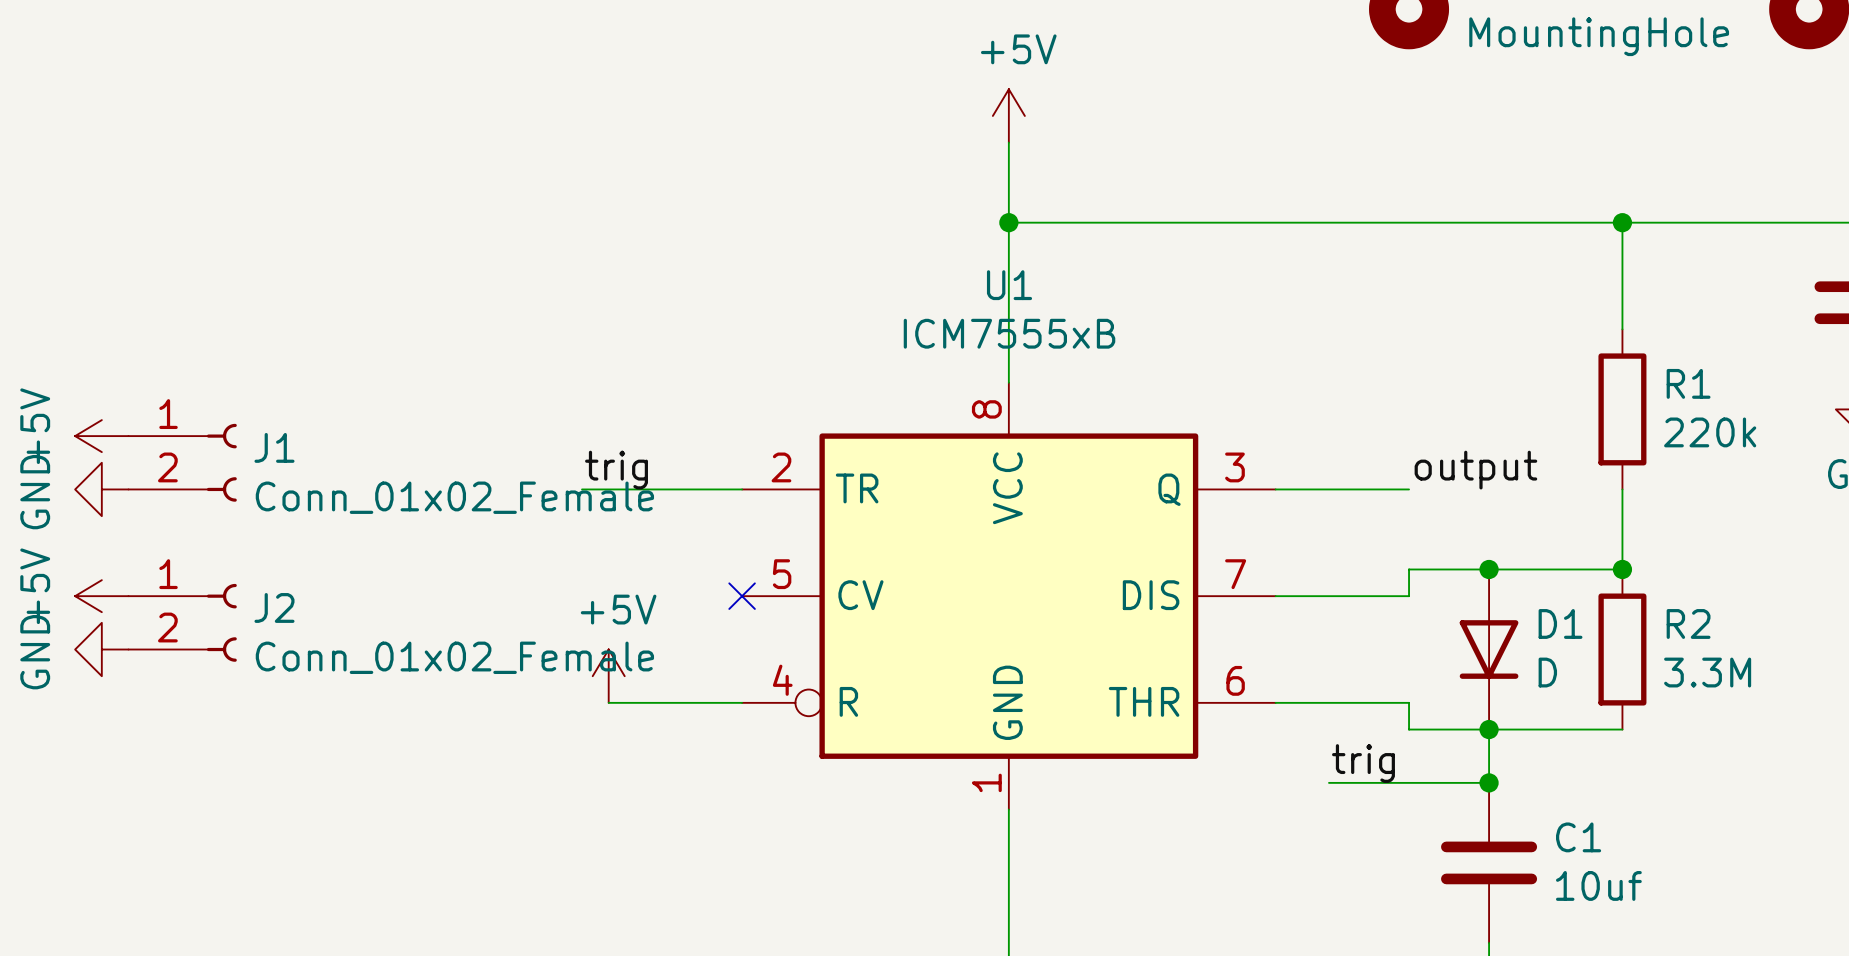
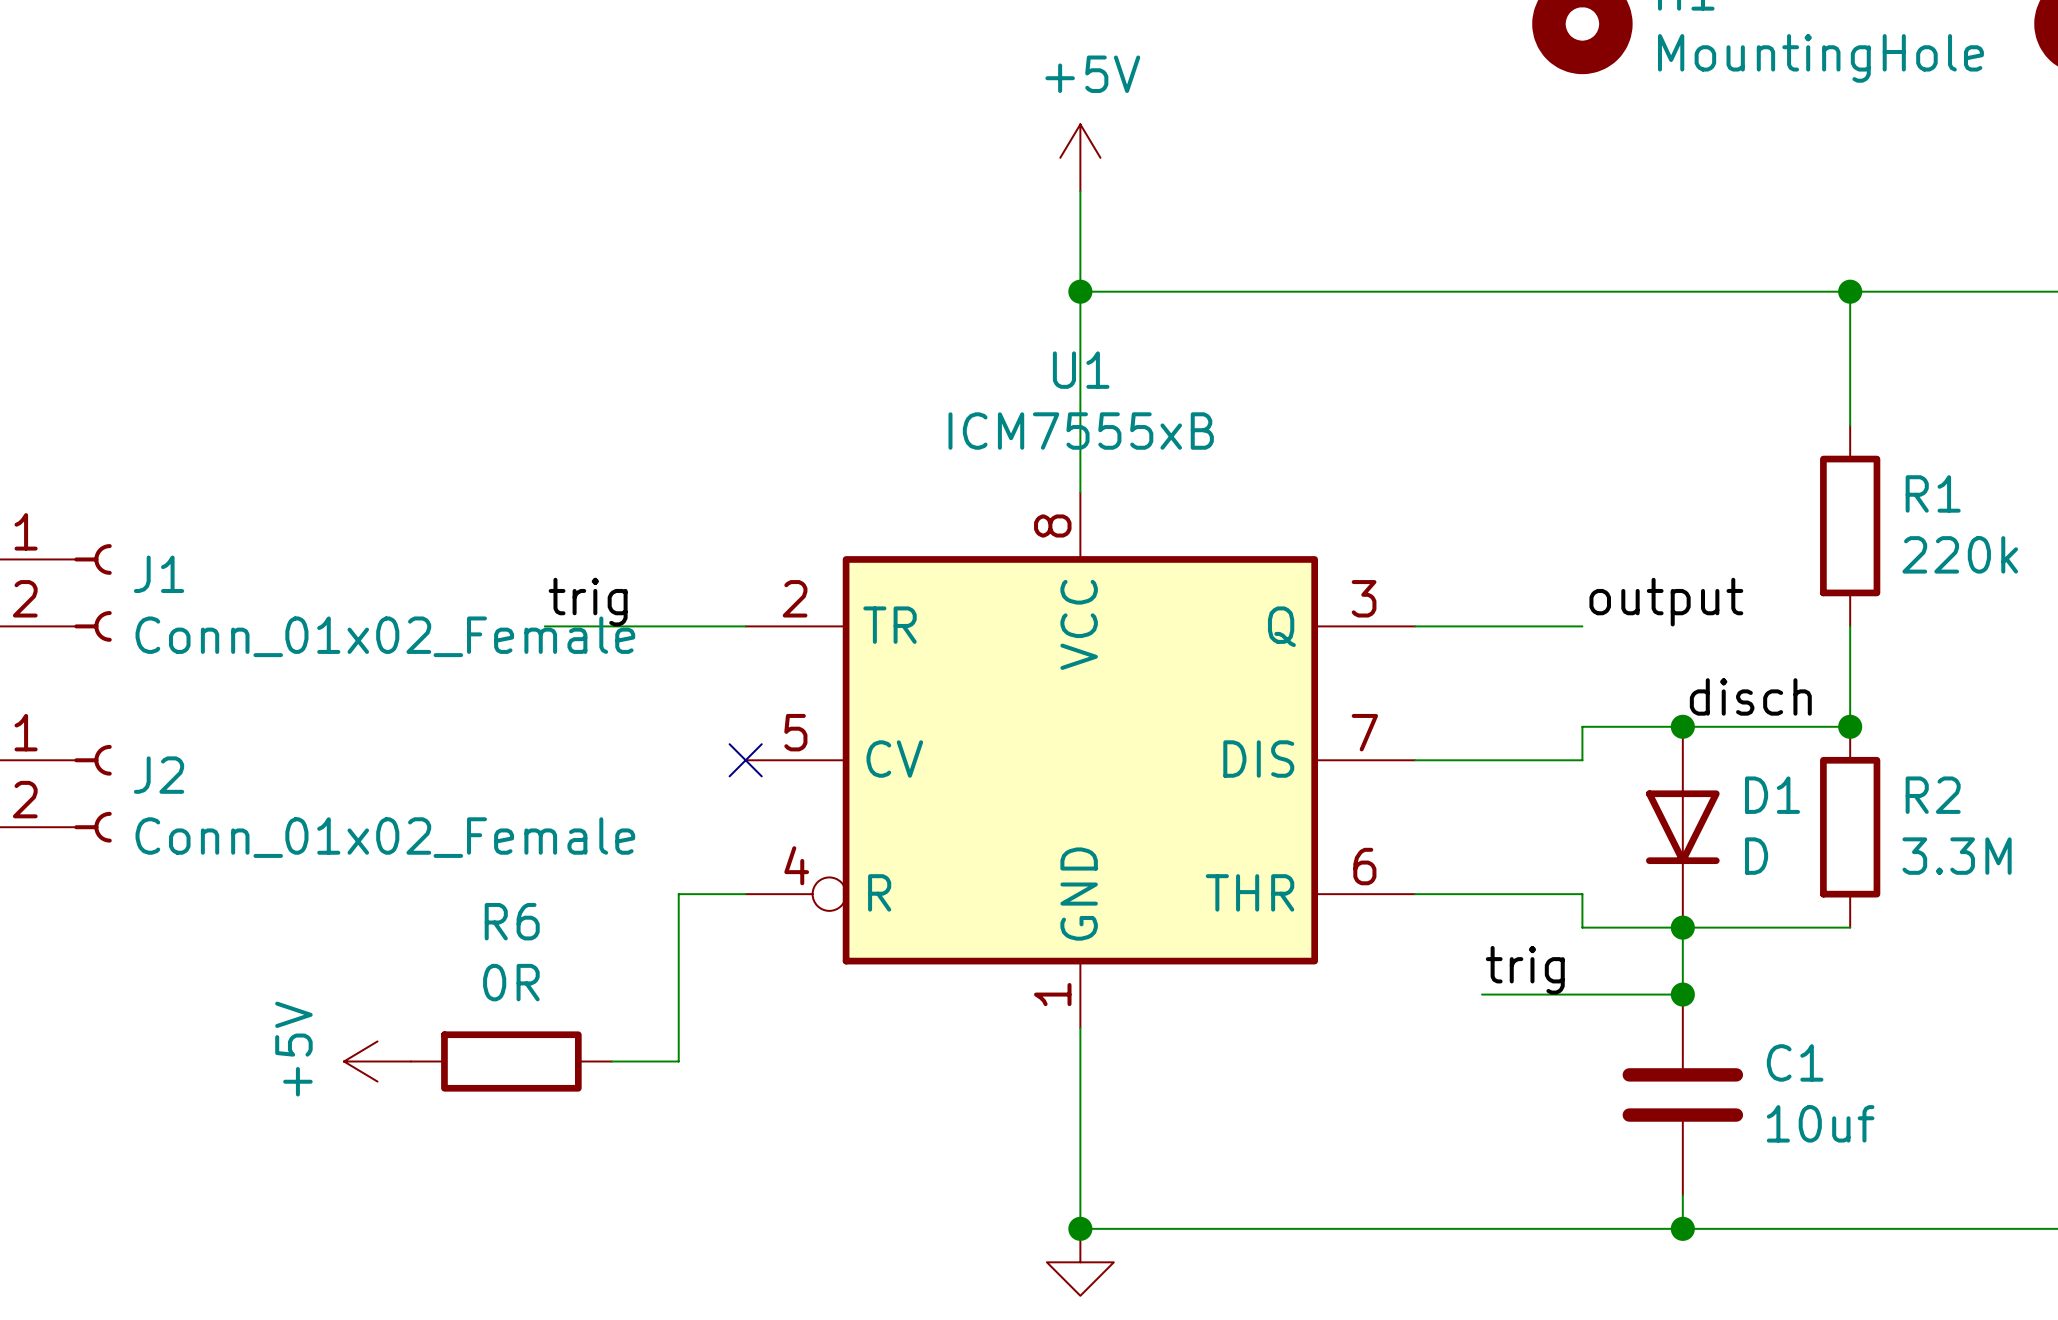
label: none -> disch (1750, 696)
power symbol rotation: 0° (608, 676) -> 90° counterclockwise (377, 1061)
power symbol position: +5V (608, 676) -> +5V (377, 1061)
wire: (608, 702) (688, 702) -> (611, 1061) (678, 1061) (678, 894)
R6: none -> 0R (511, 1061)

